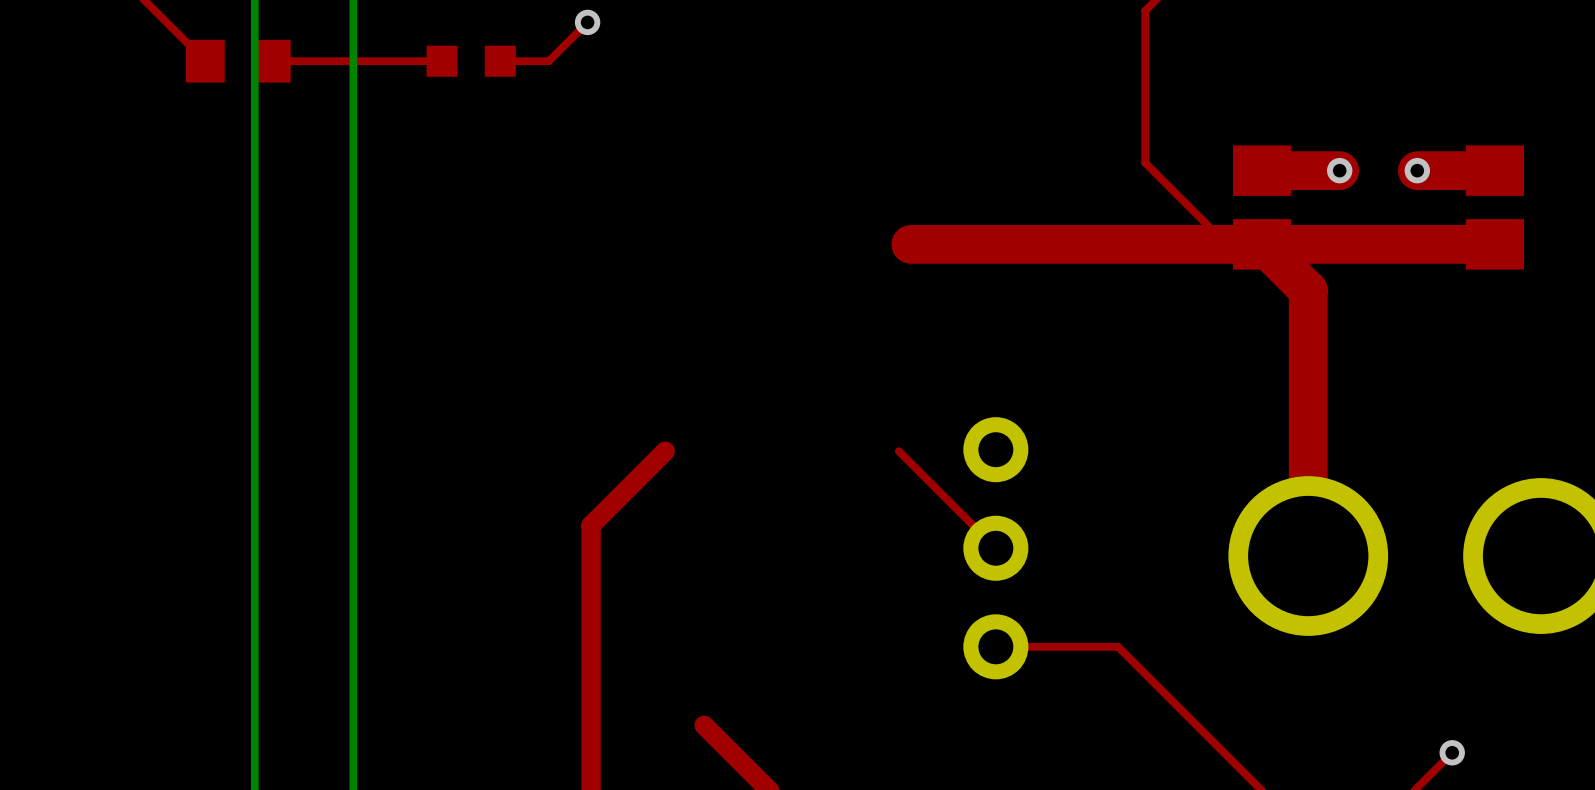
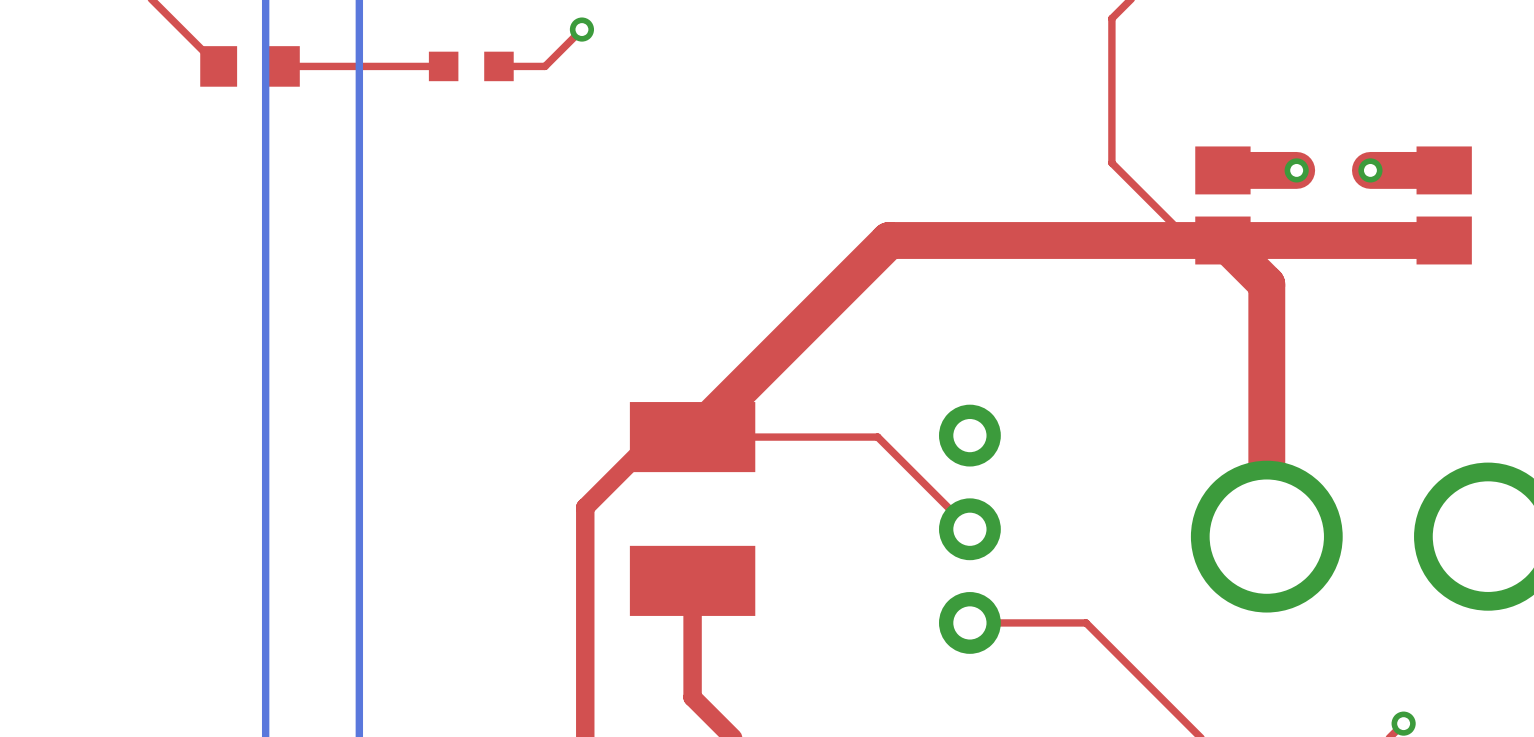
top track: none -> (889, 240) (692, 437)
top track: none -> (877, 437) (692, 437)
part: none -> (692, 508)
top track: none -> (692, 580) (692, 697)

